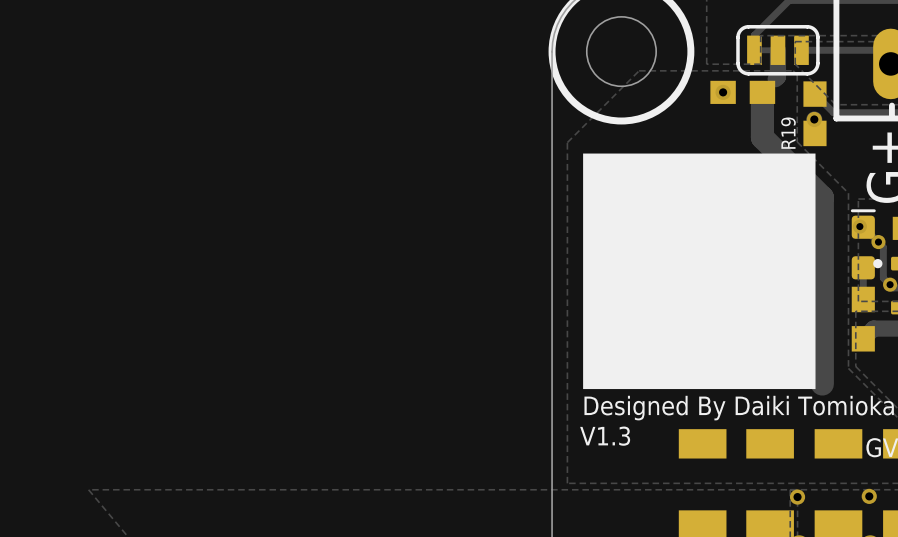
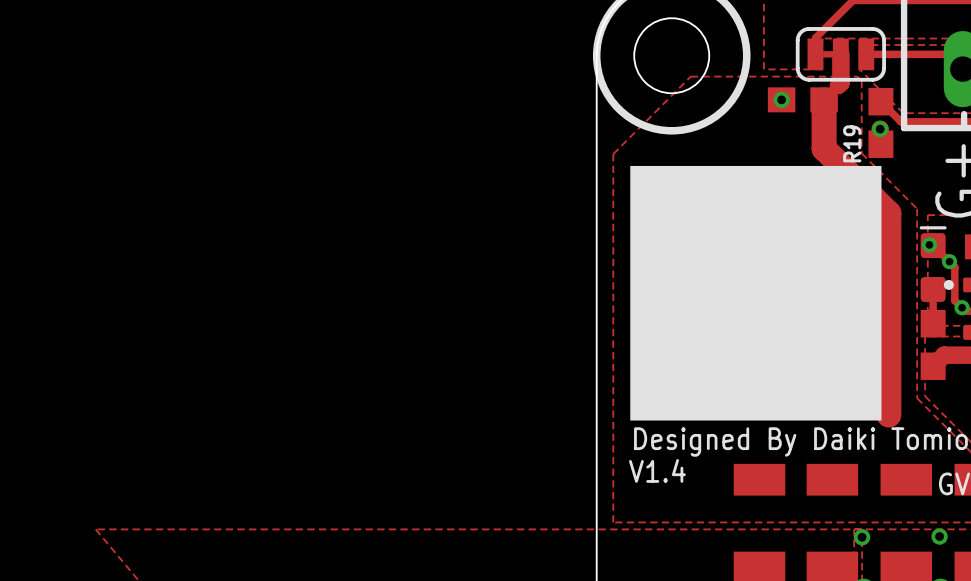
text: V1.3 (605, 436) -> V1.4 (657, 470)

